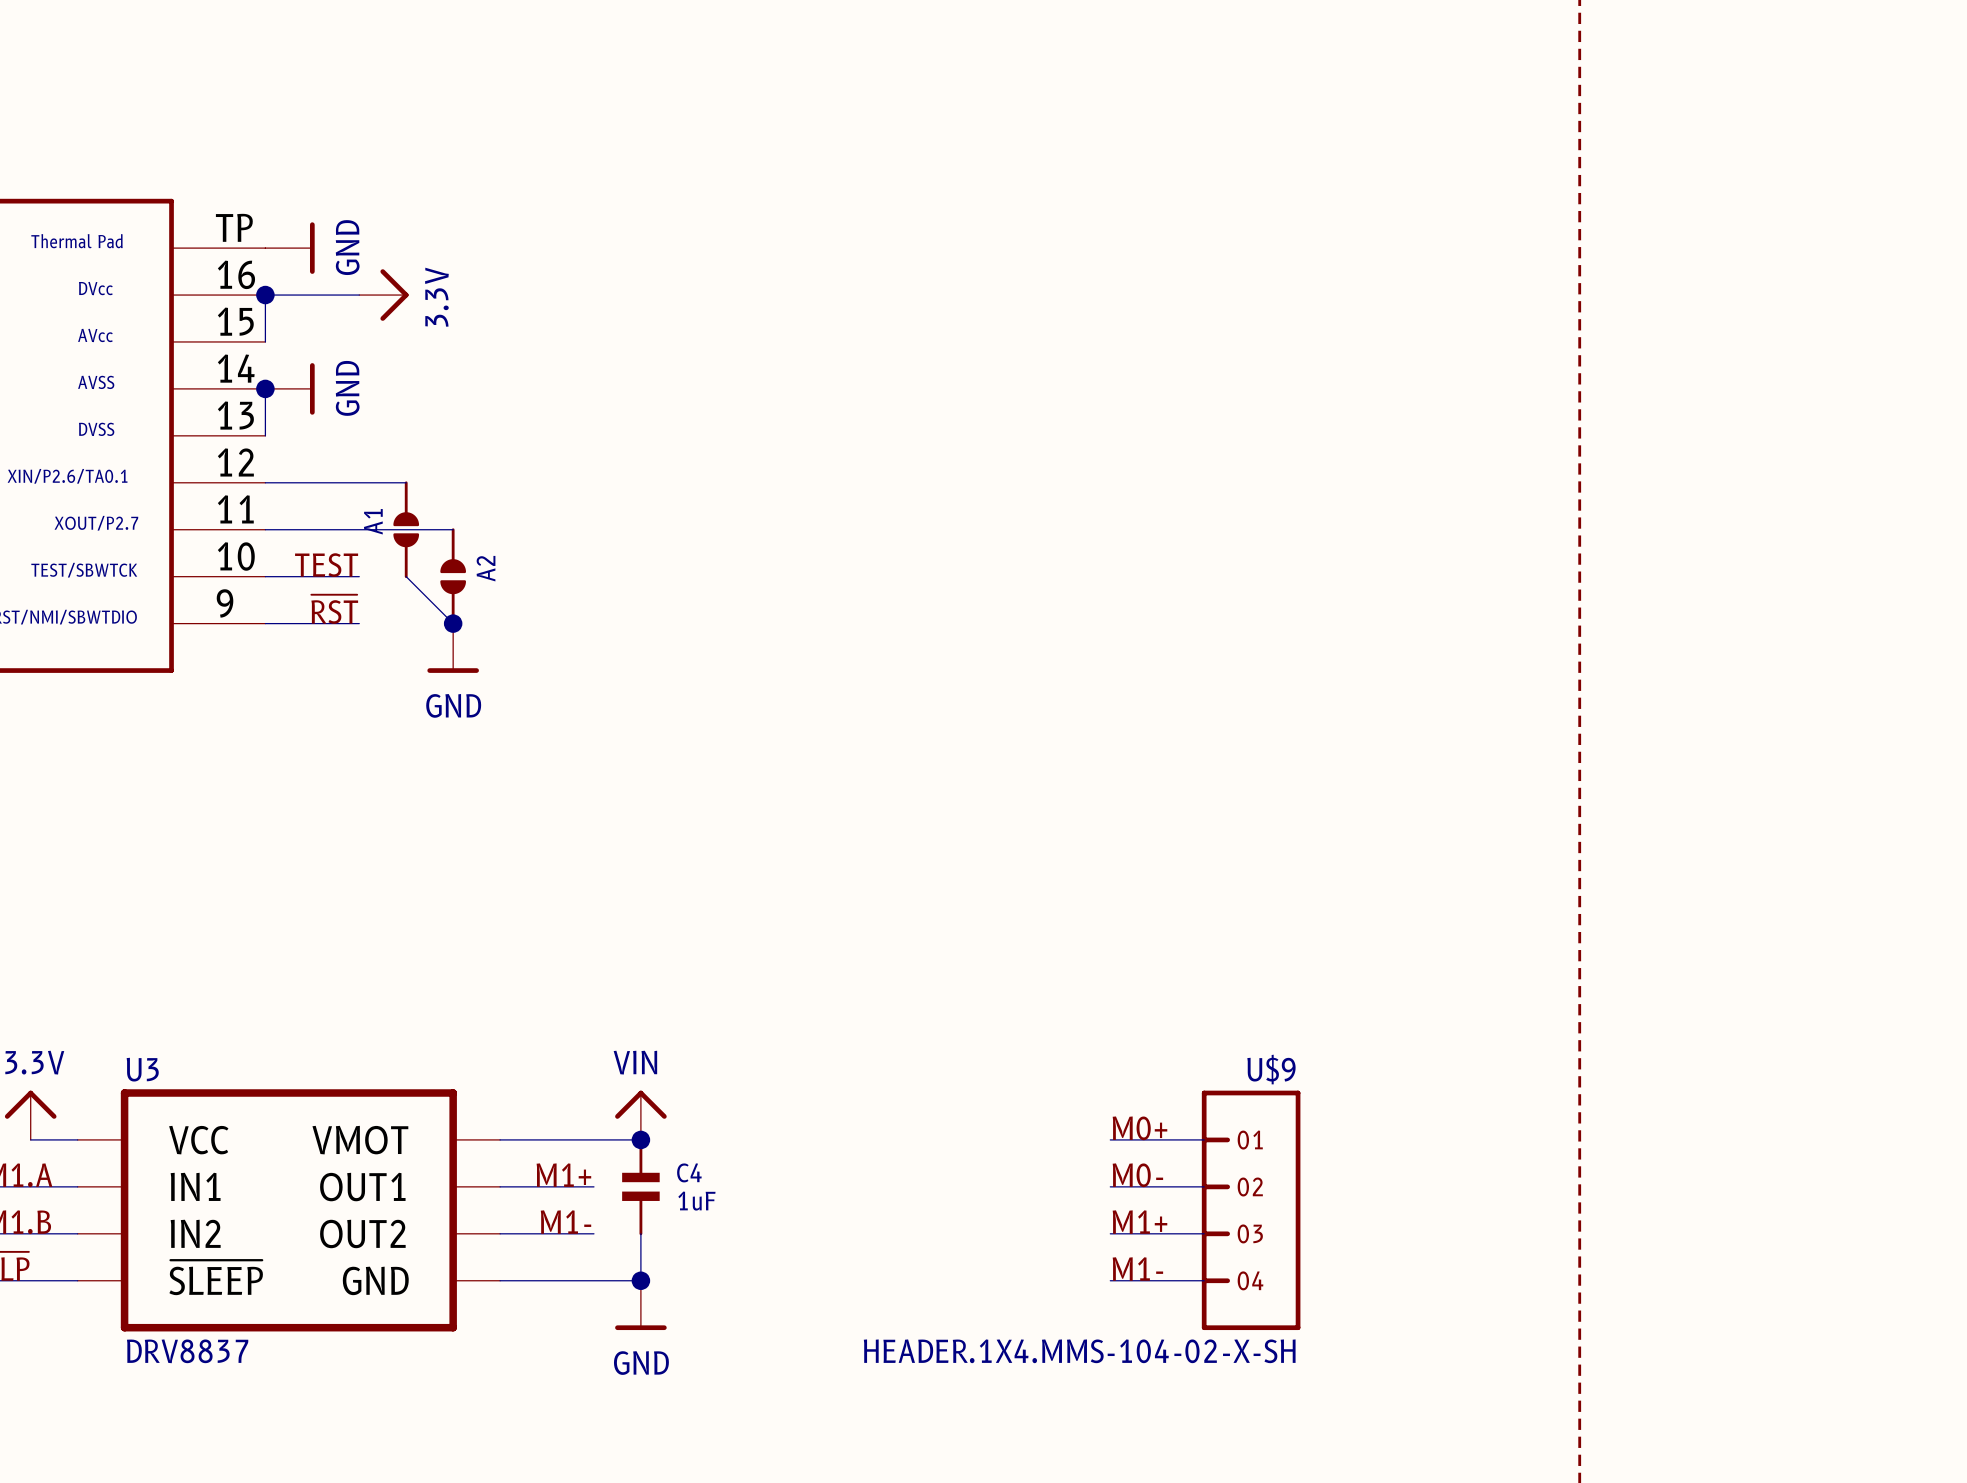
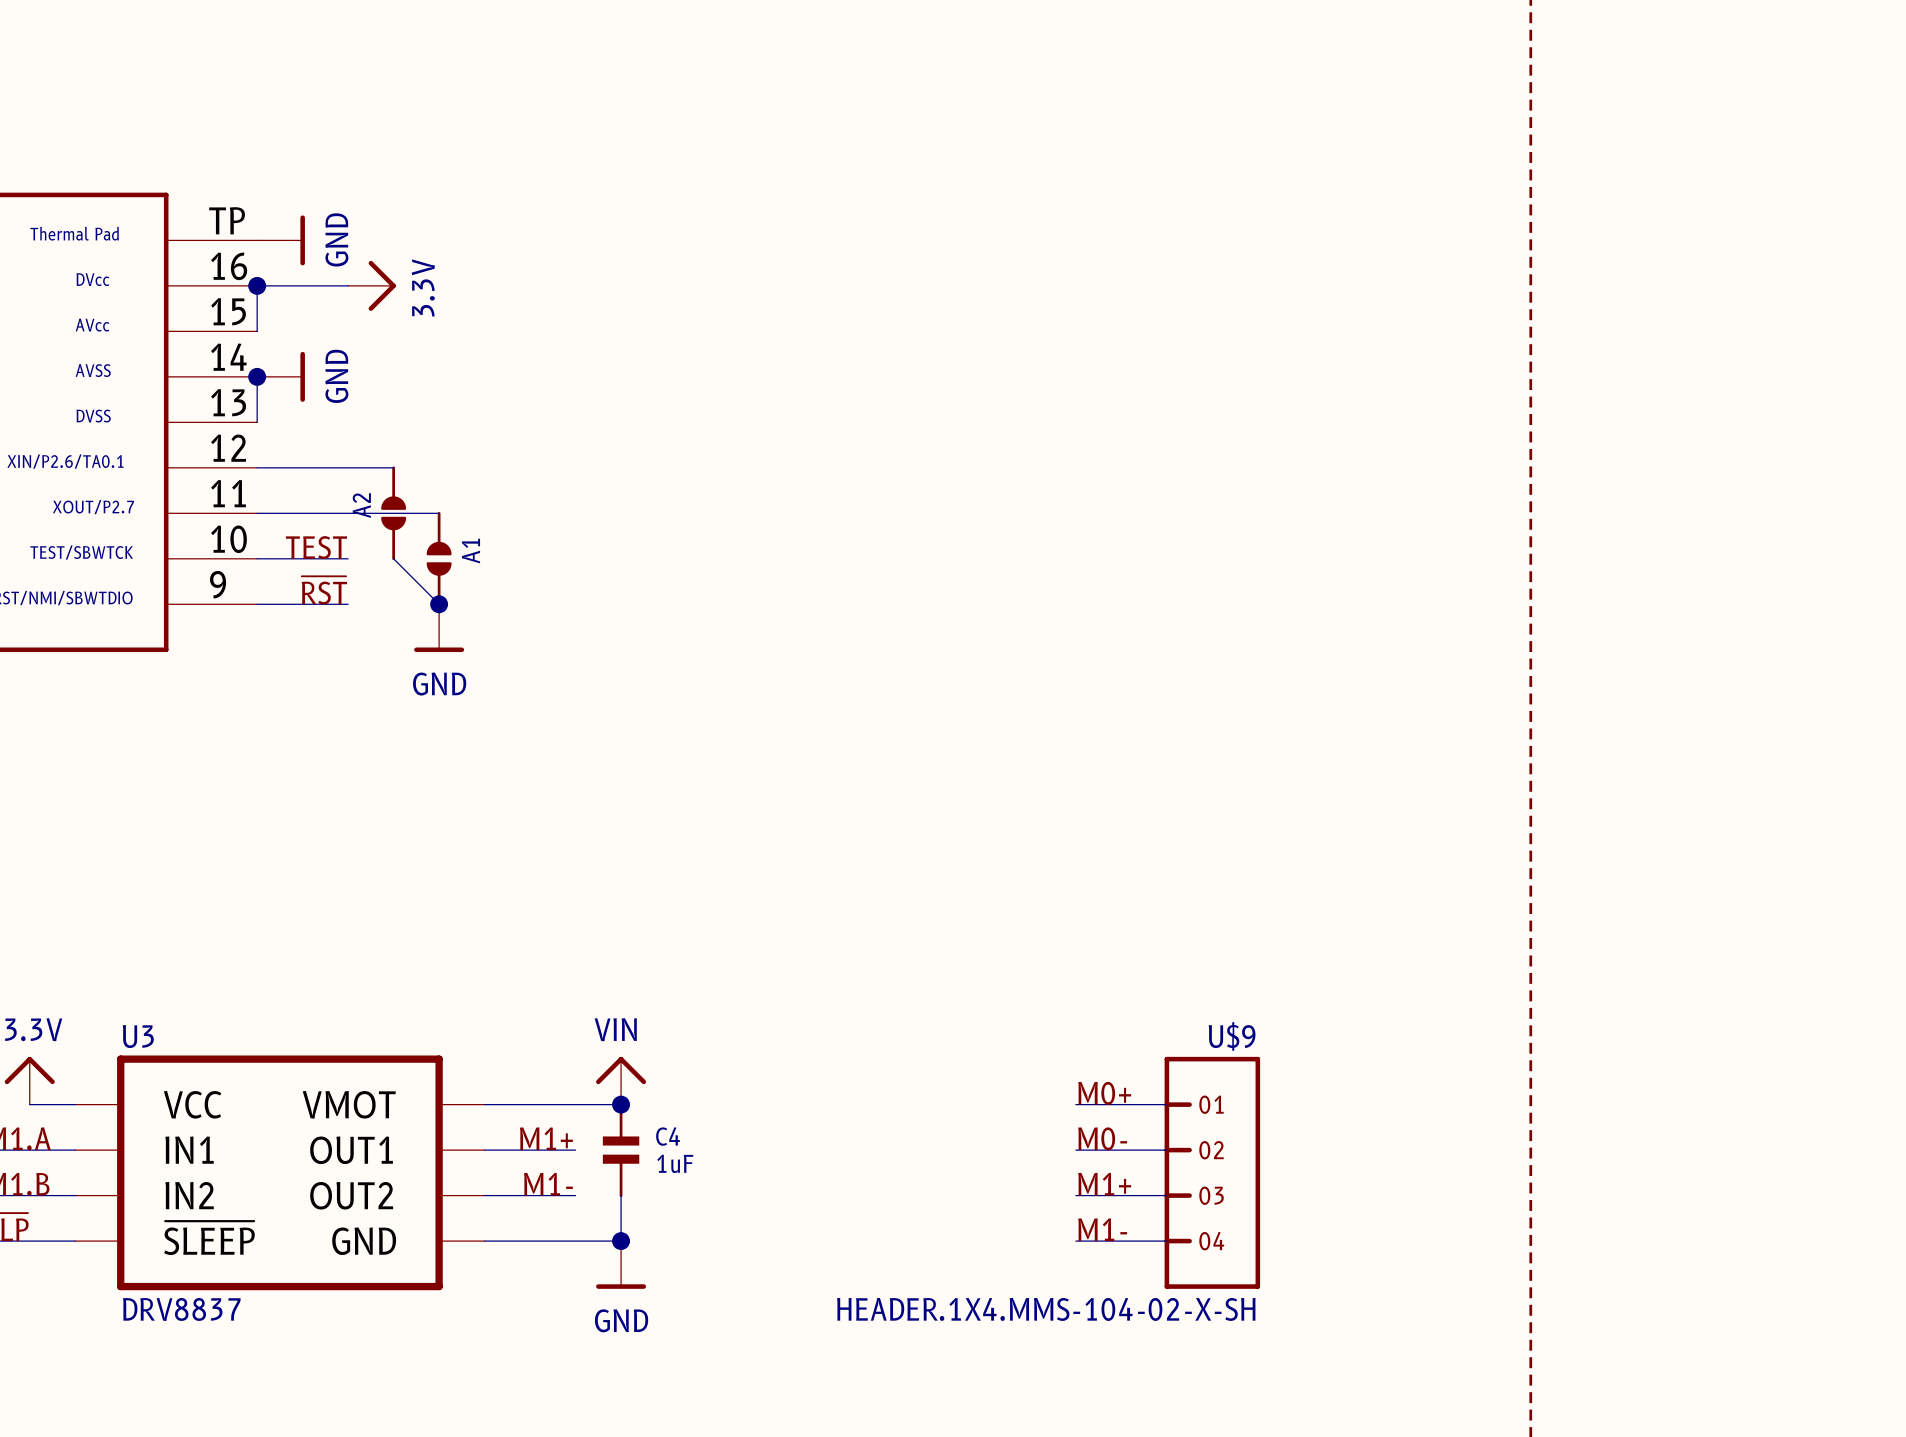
A1 name: A1 (373, 521) -> A2 (361, 505)
A2 name: A2 (486, 568) -> A1 (470, 551)

